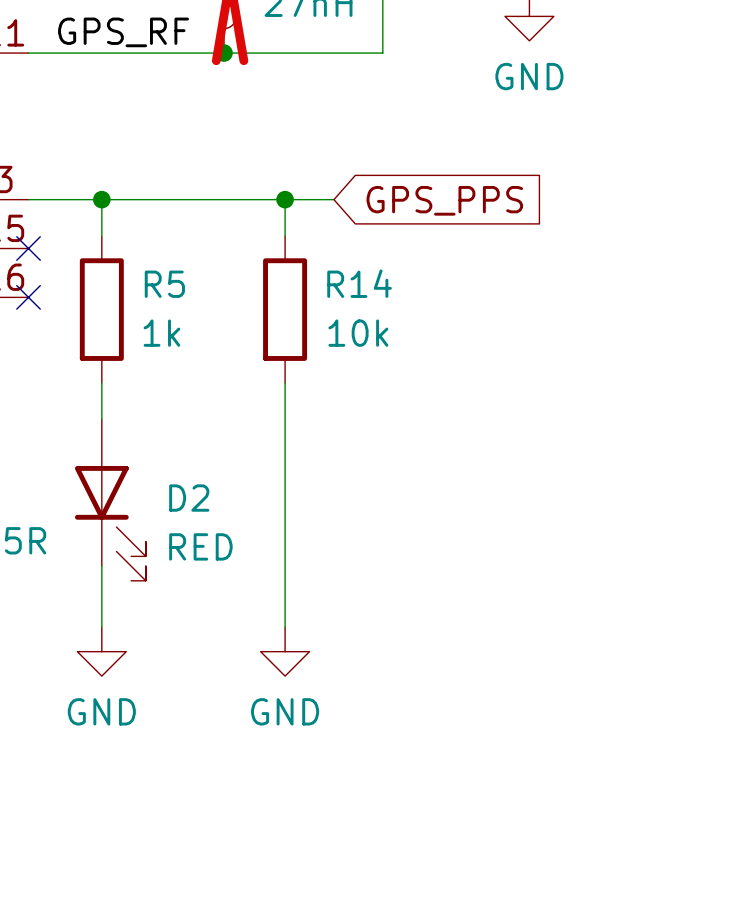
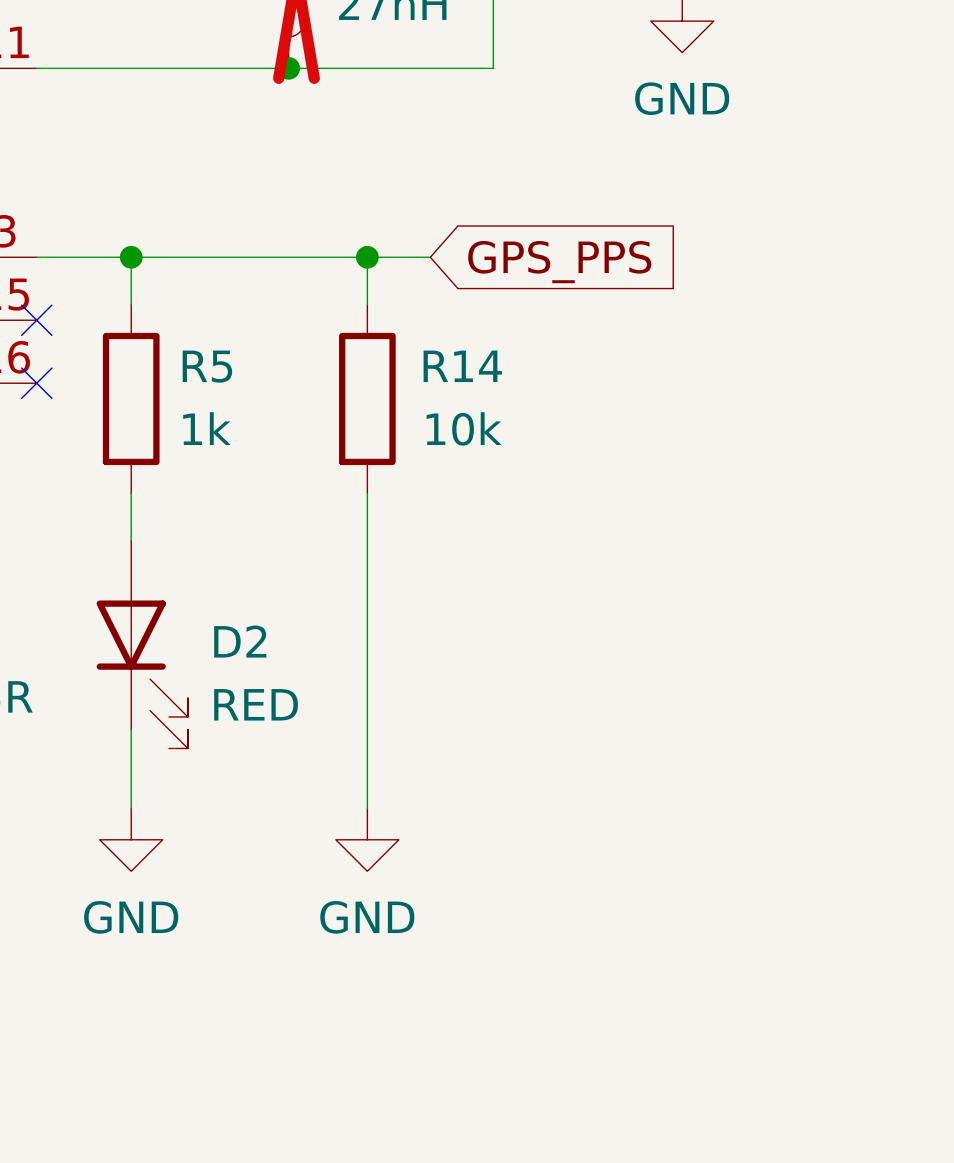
label: GPS_RF (123, 32) -> none

